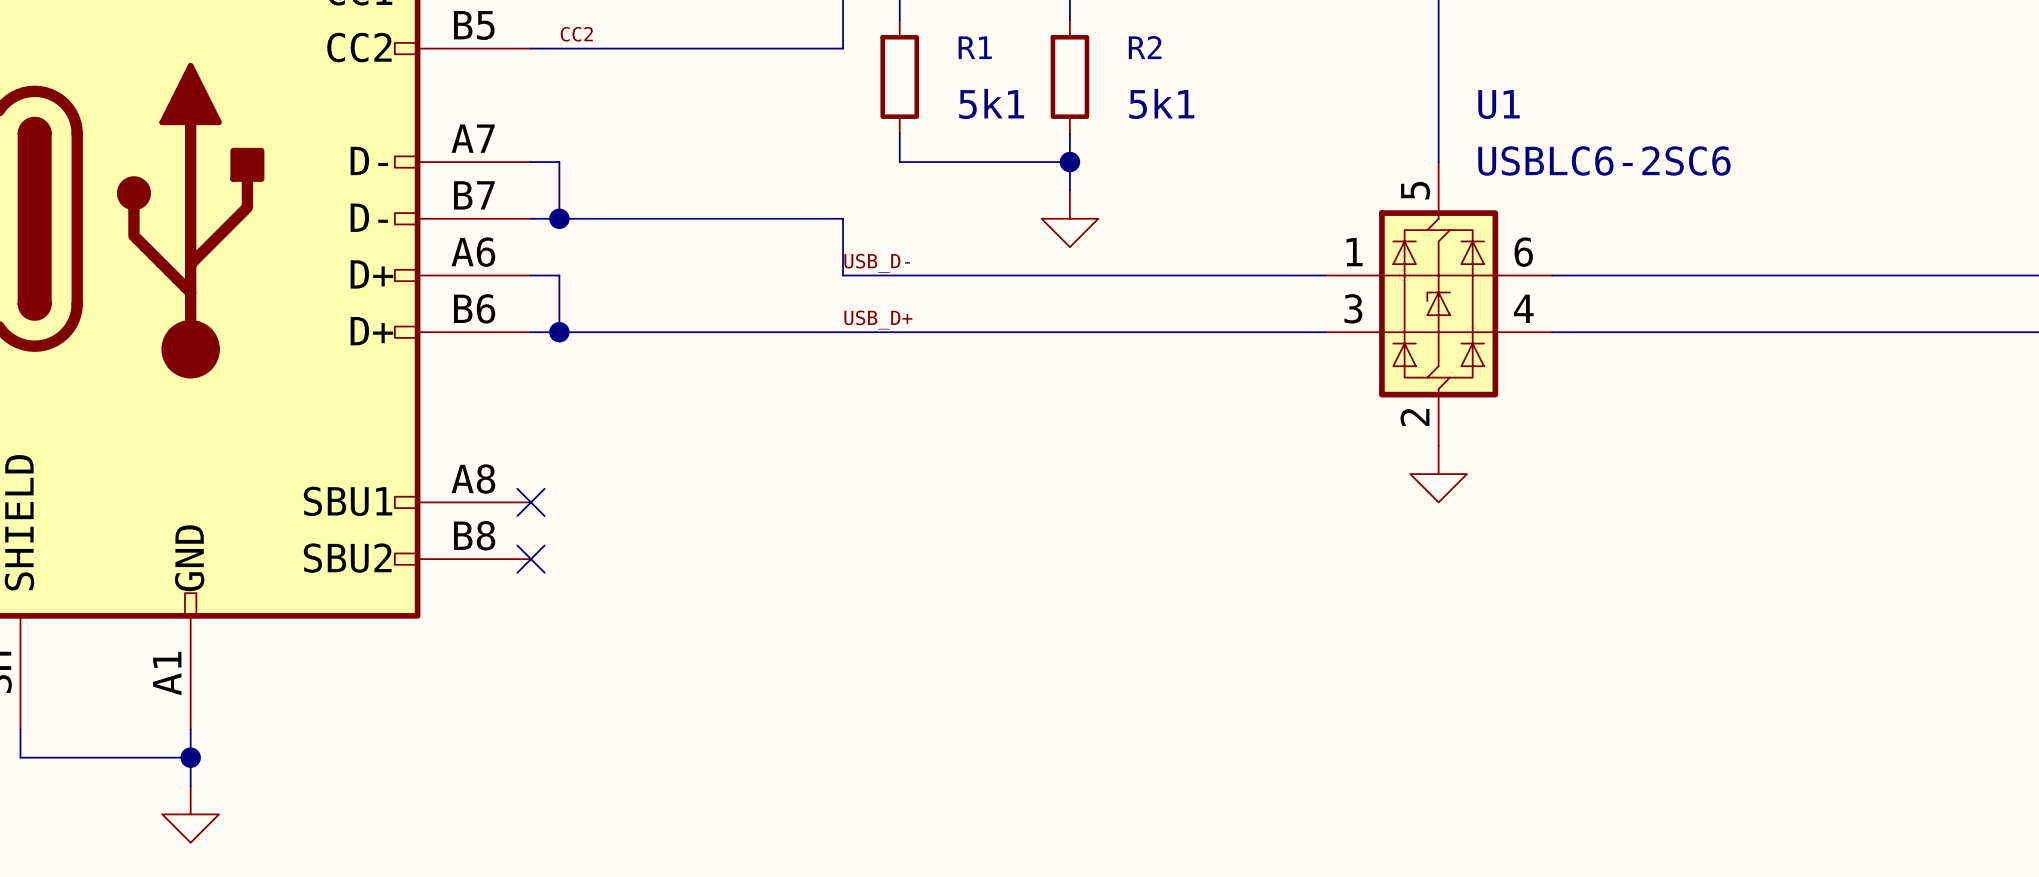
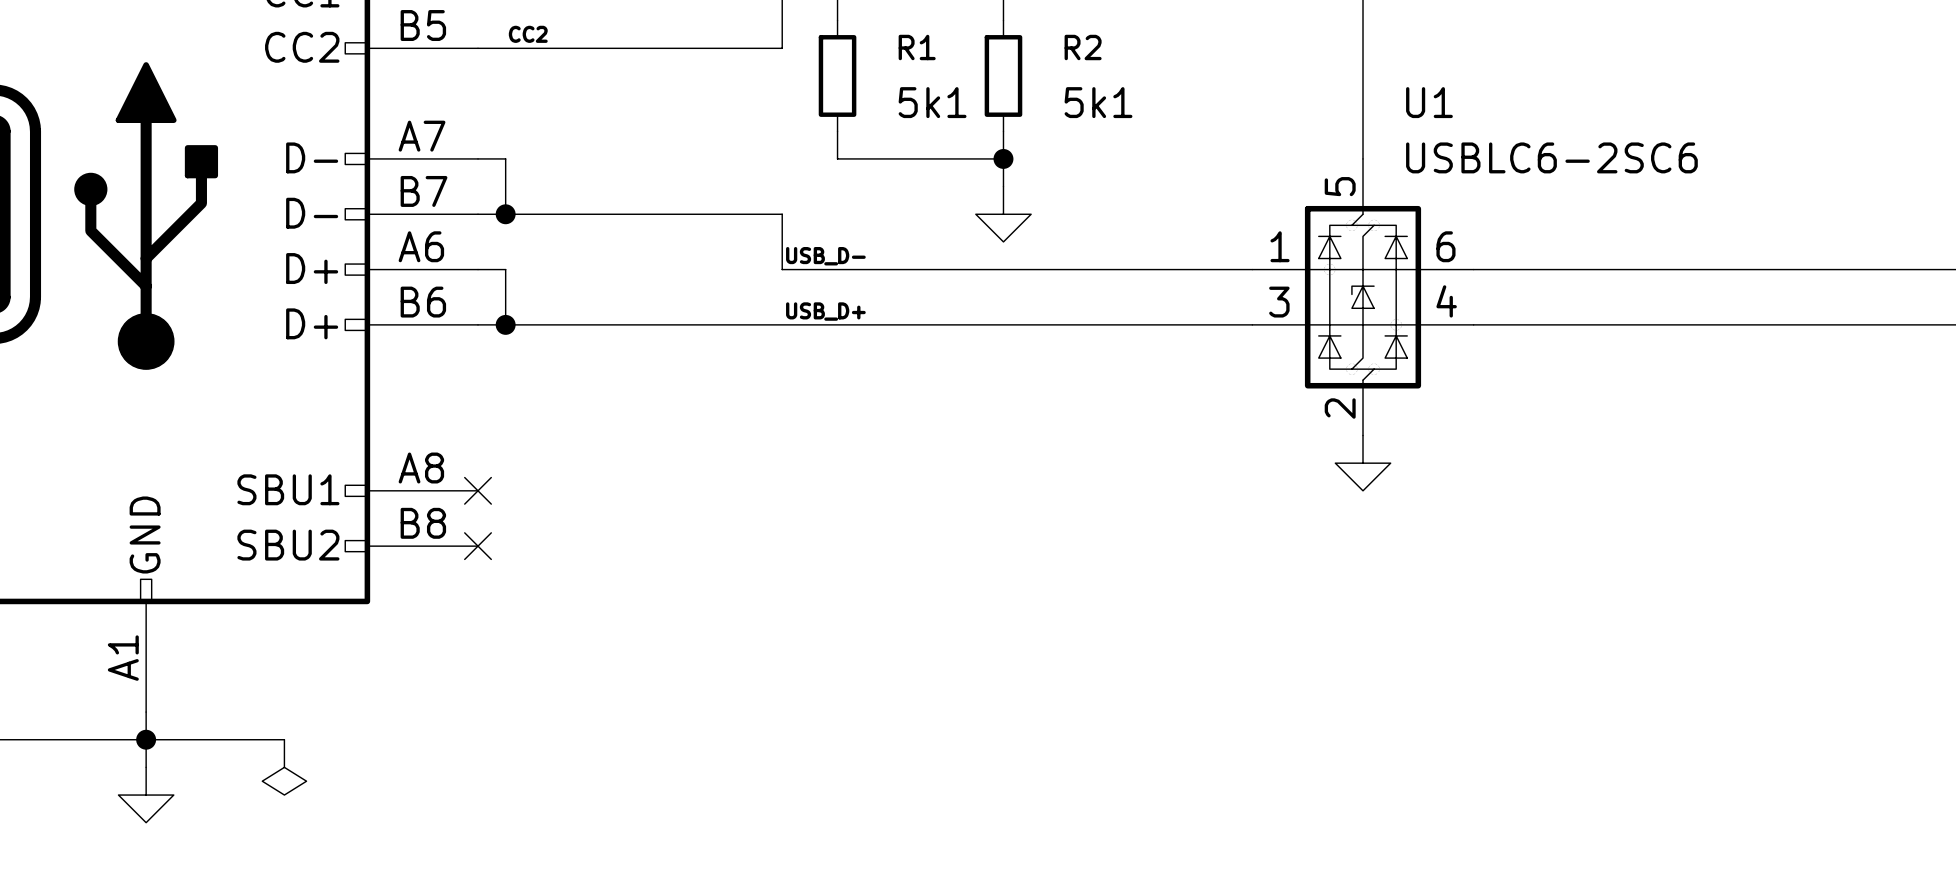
wire: none -> (146, 739) (284, 739)
power symbol: none -> (284, 767)

